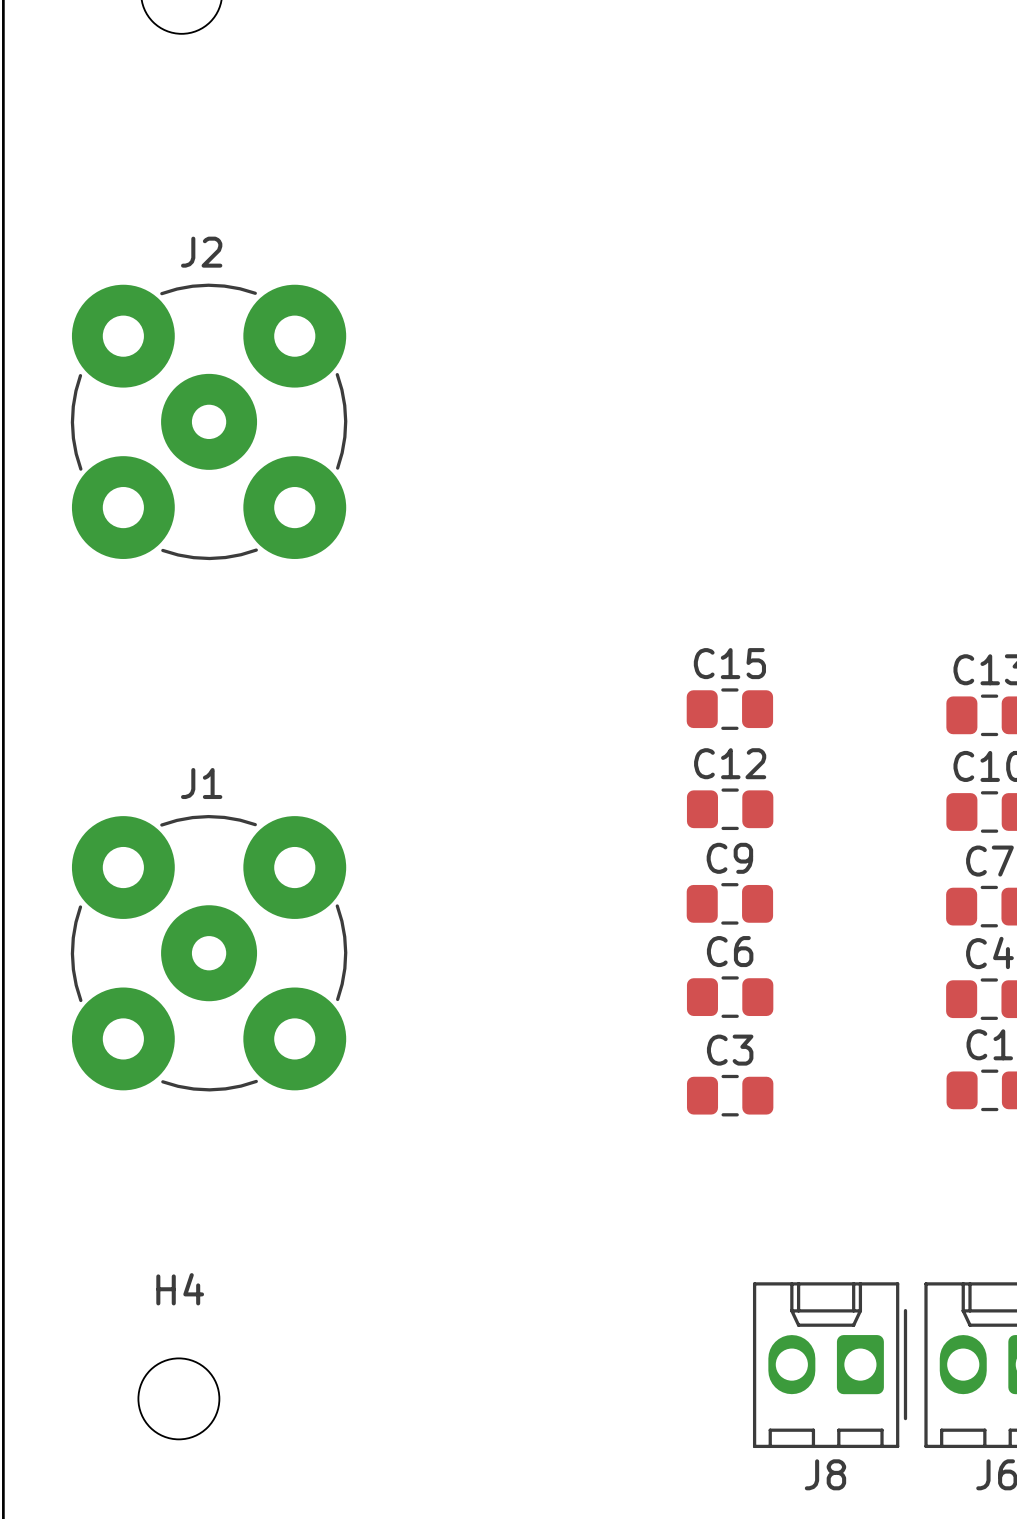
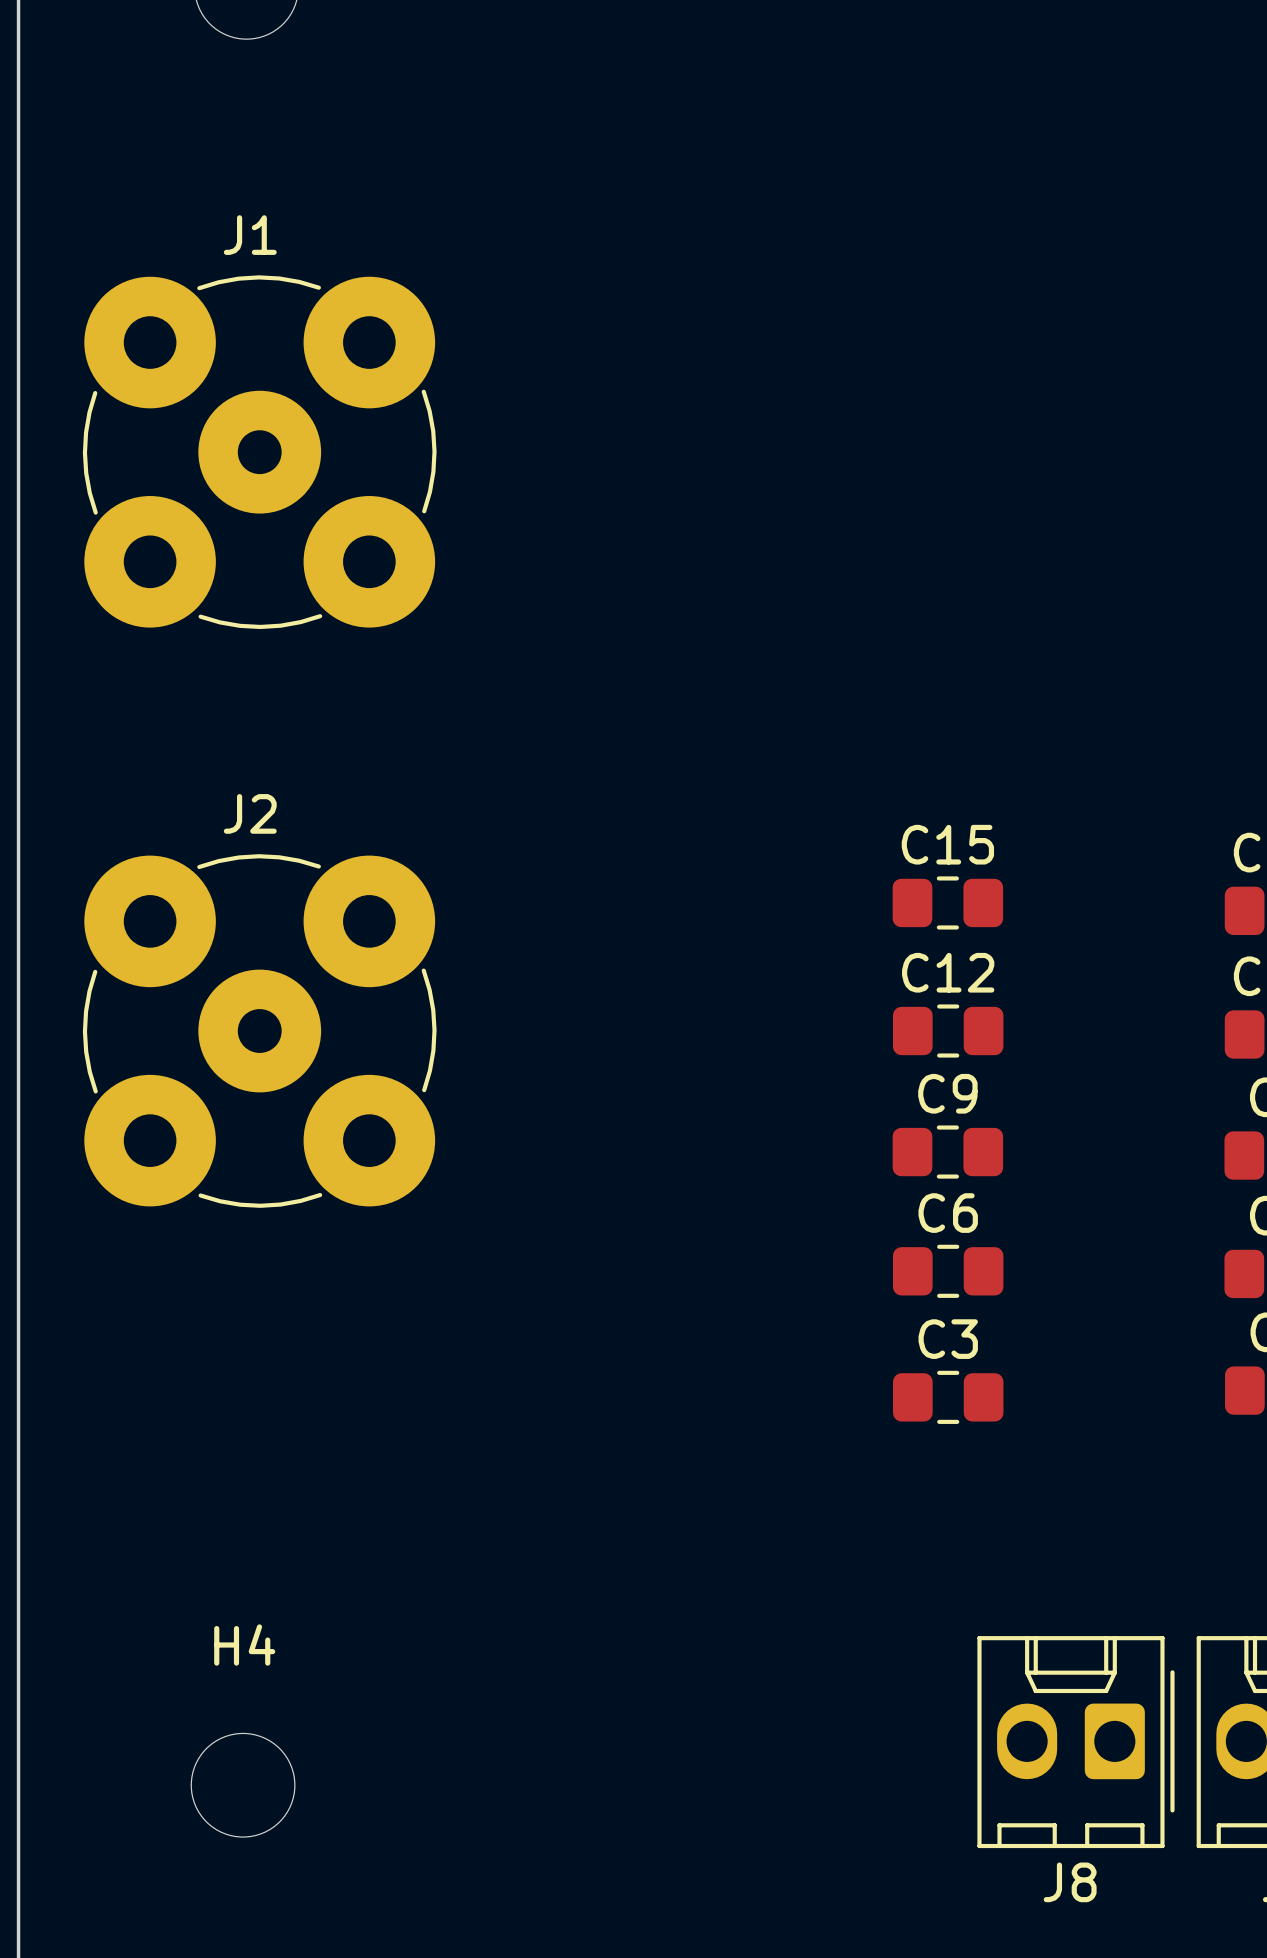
J2 position: (209, 421) -> (259, 1031)
J1 position: (209, 953) -> (259, 452)

